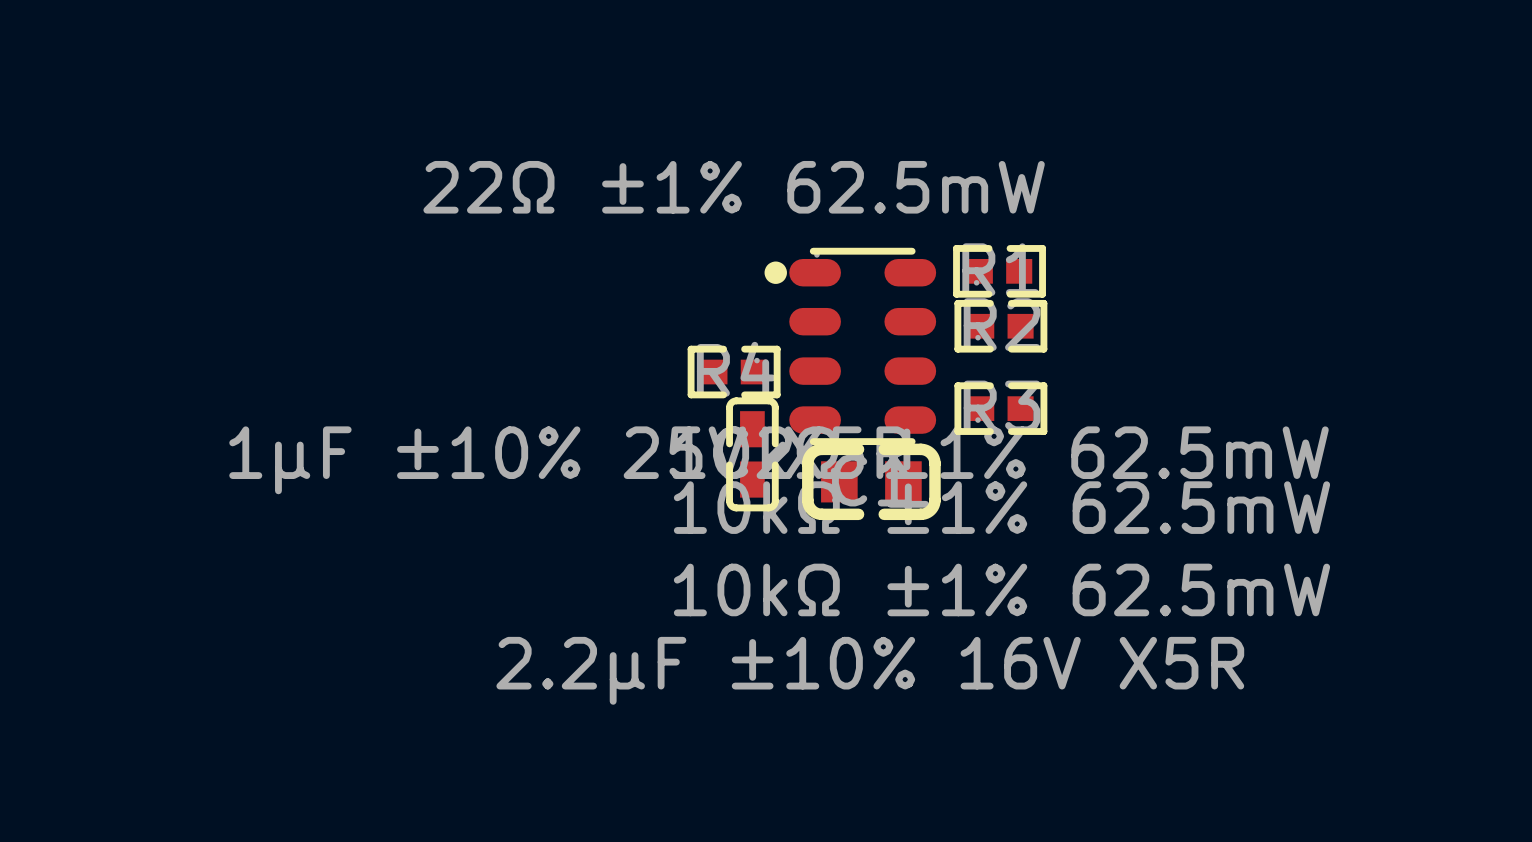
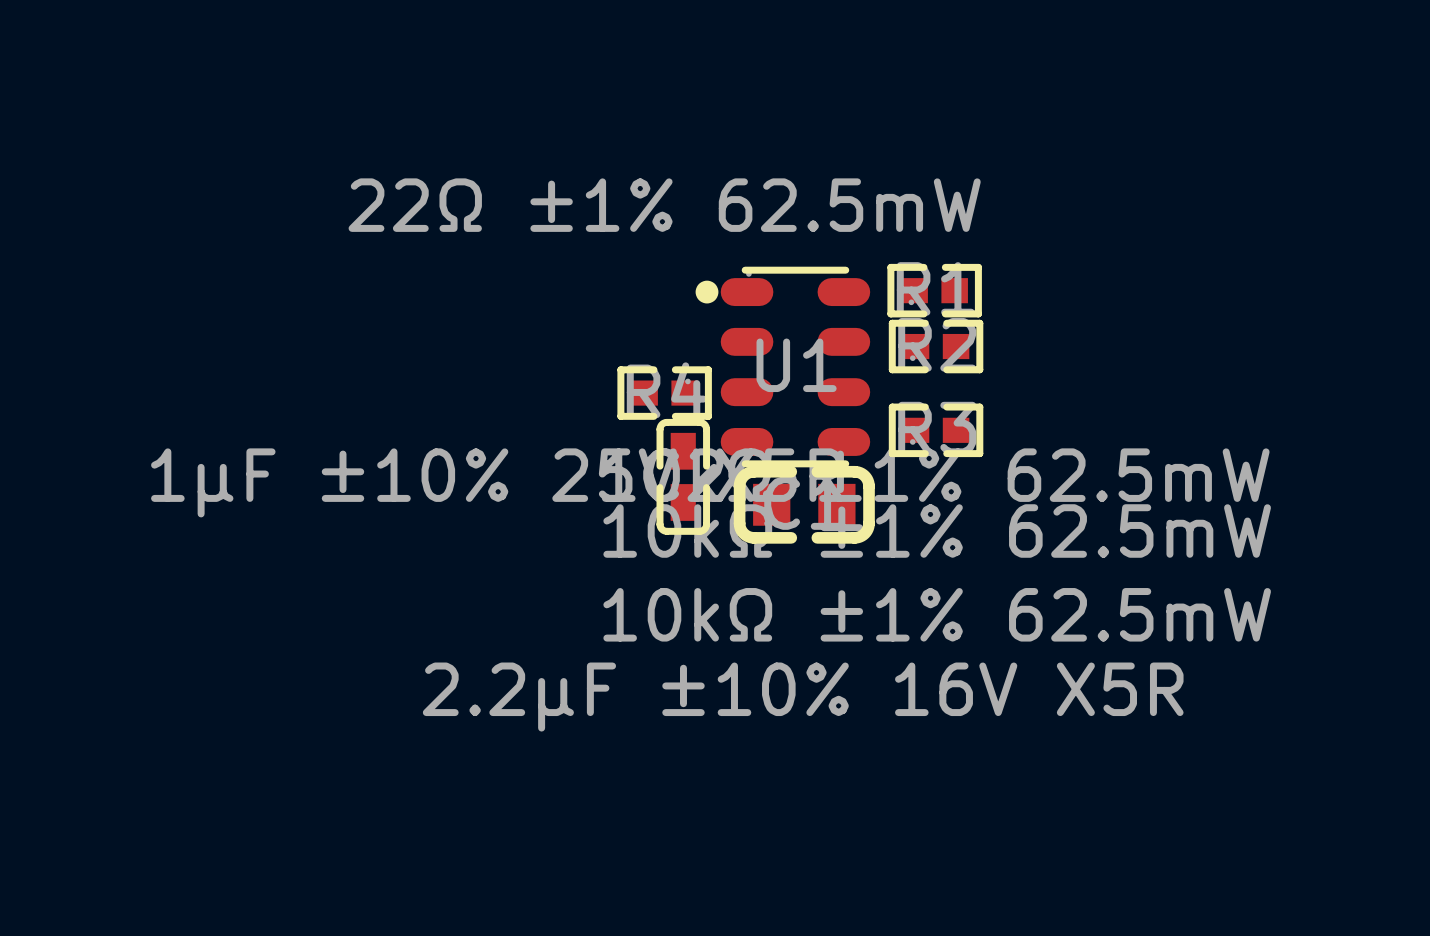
U1 name: none -> U1 (796, 365)

